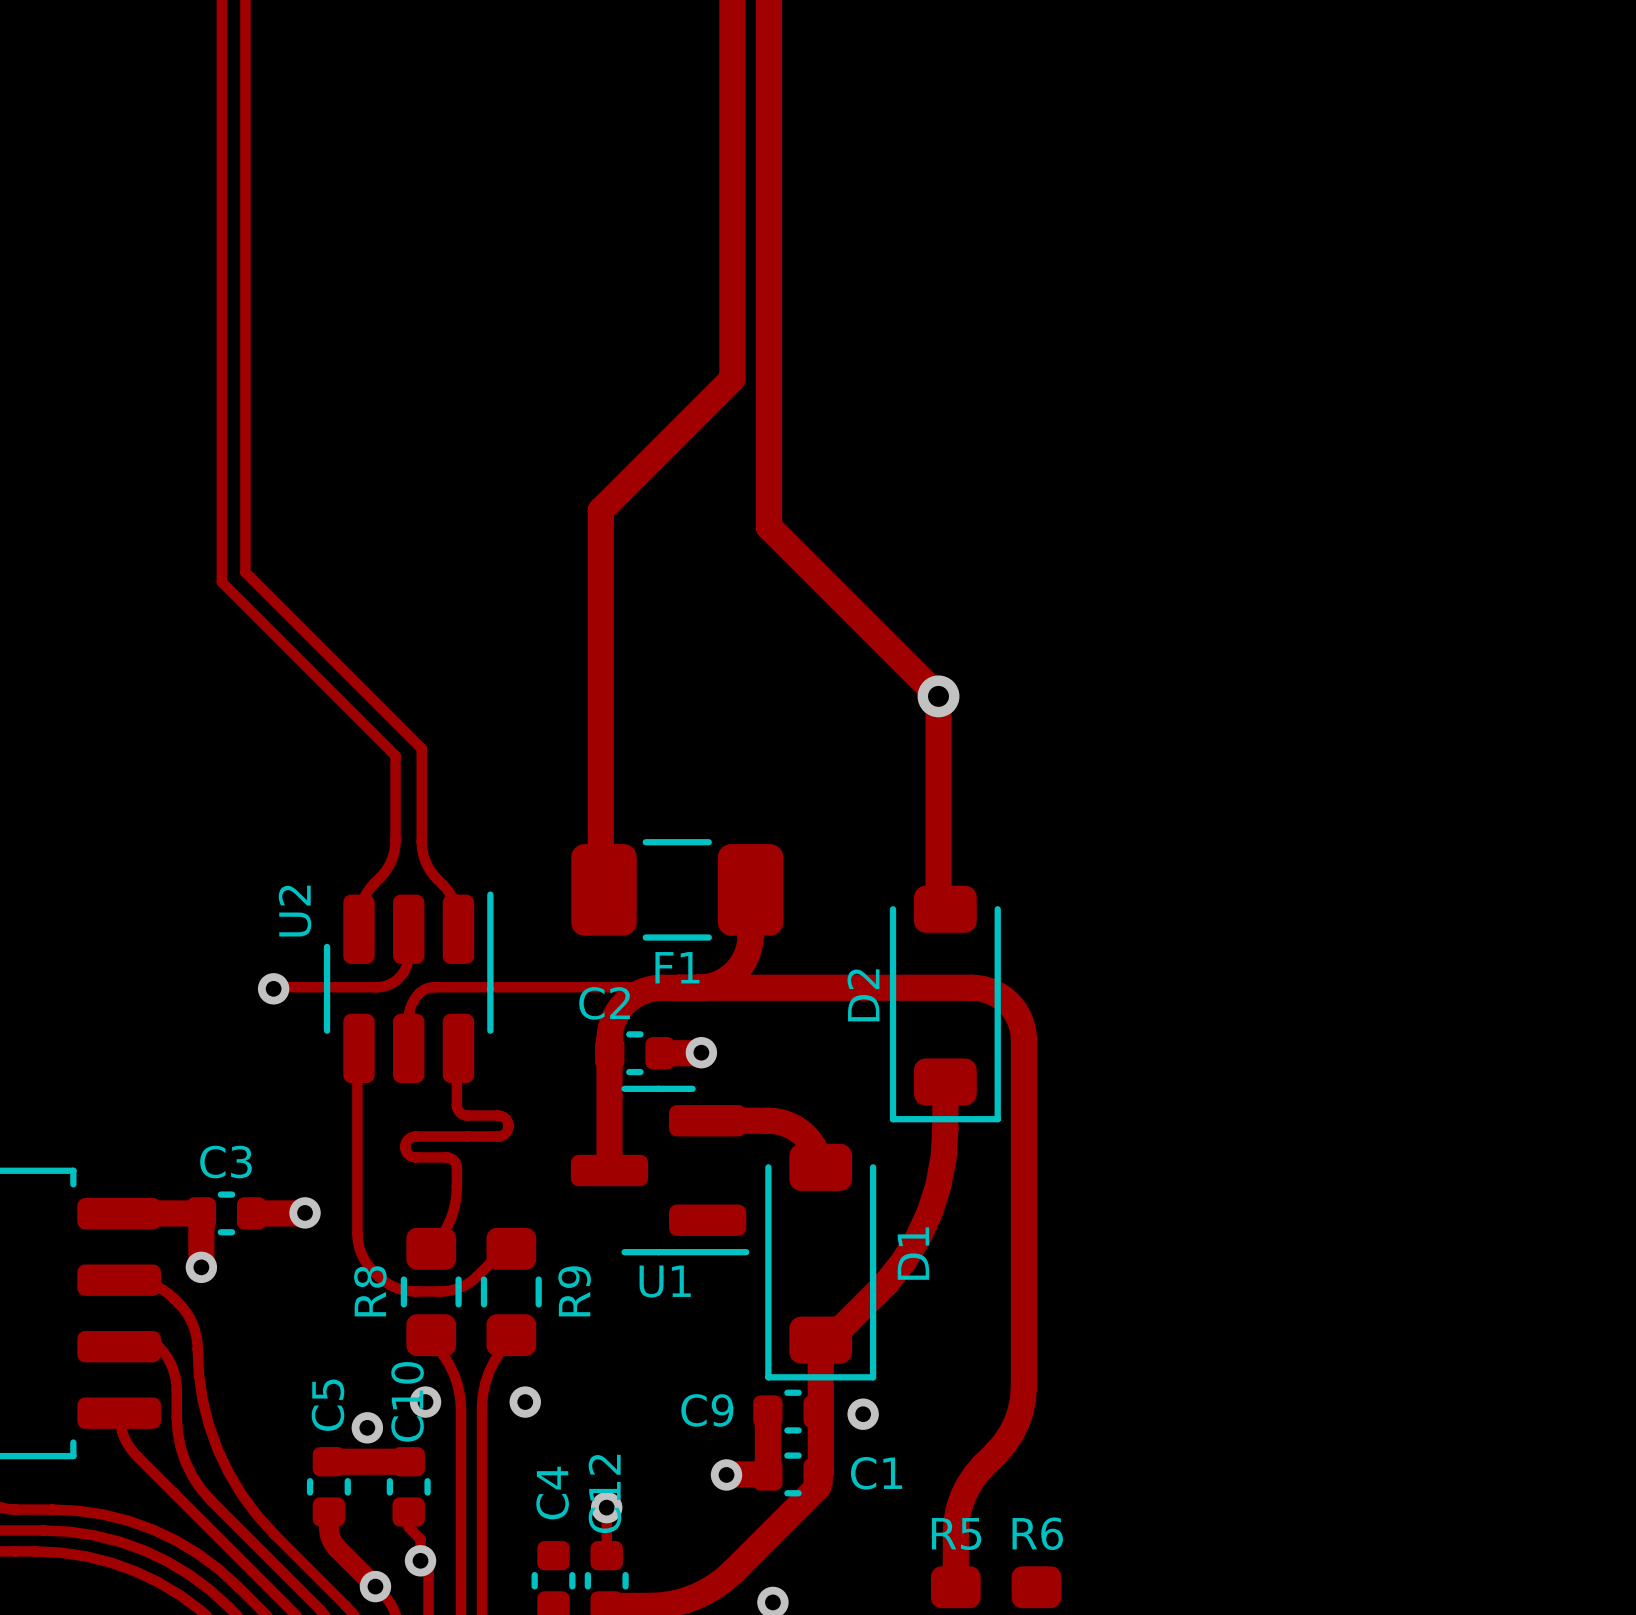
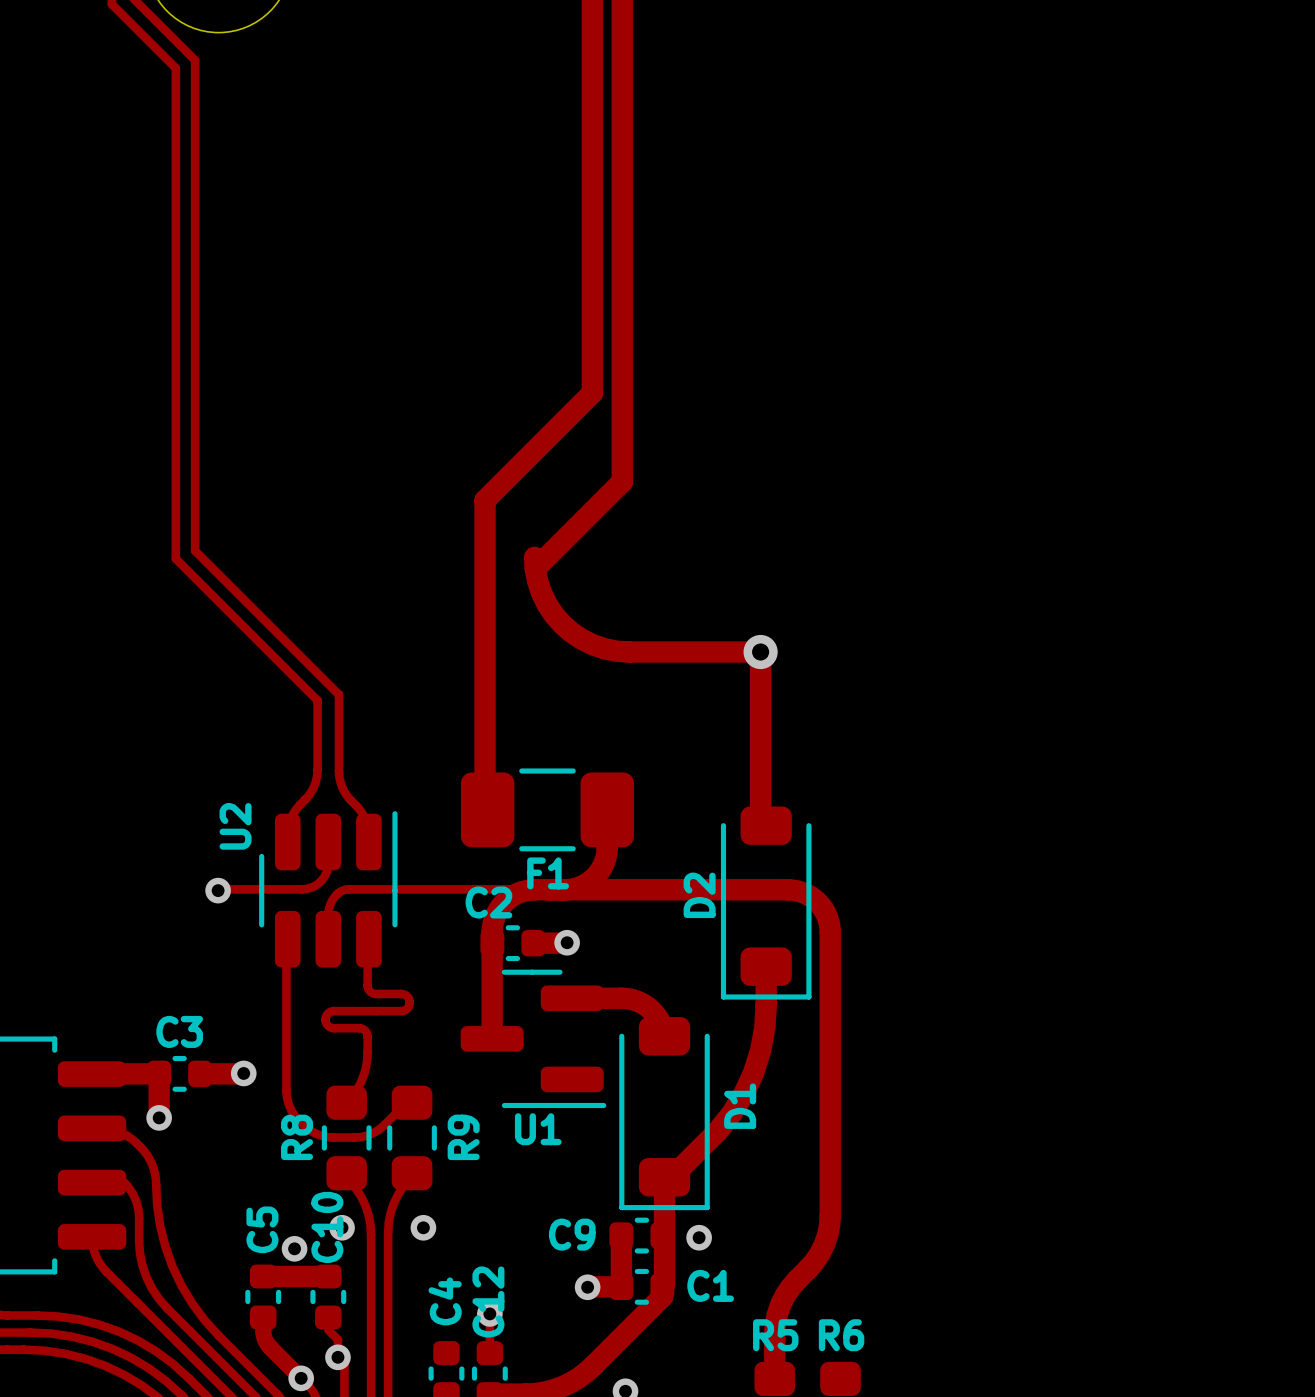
track: (769, 487) (769, 526) (938, 696) -> (534, 557) (537, 581) (541, 593) (554, 614) (571, 632) (593, 644) (616, 651) (629, 652) (760, 652)
track: none -> (622, 481) (535, 568)

